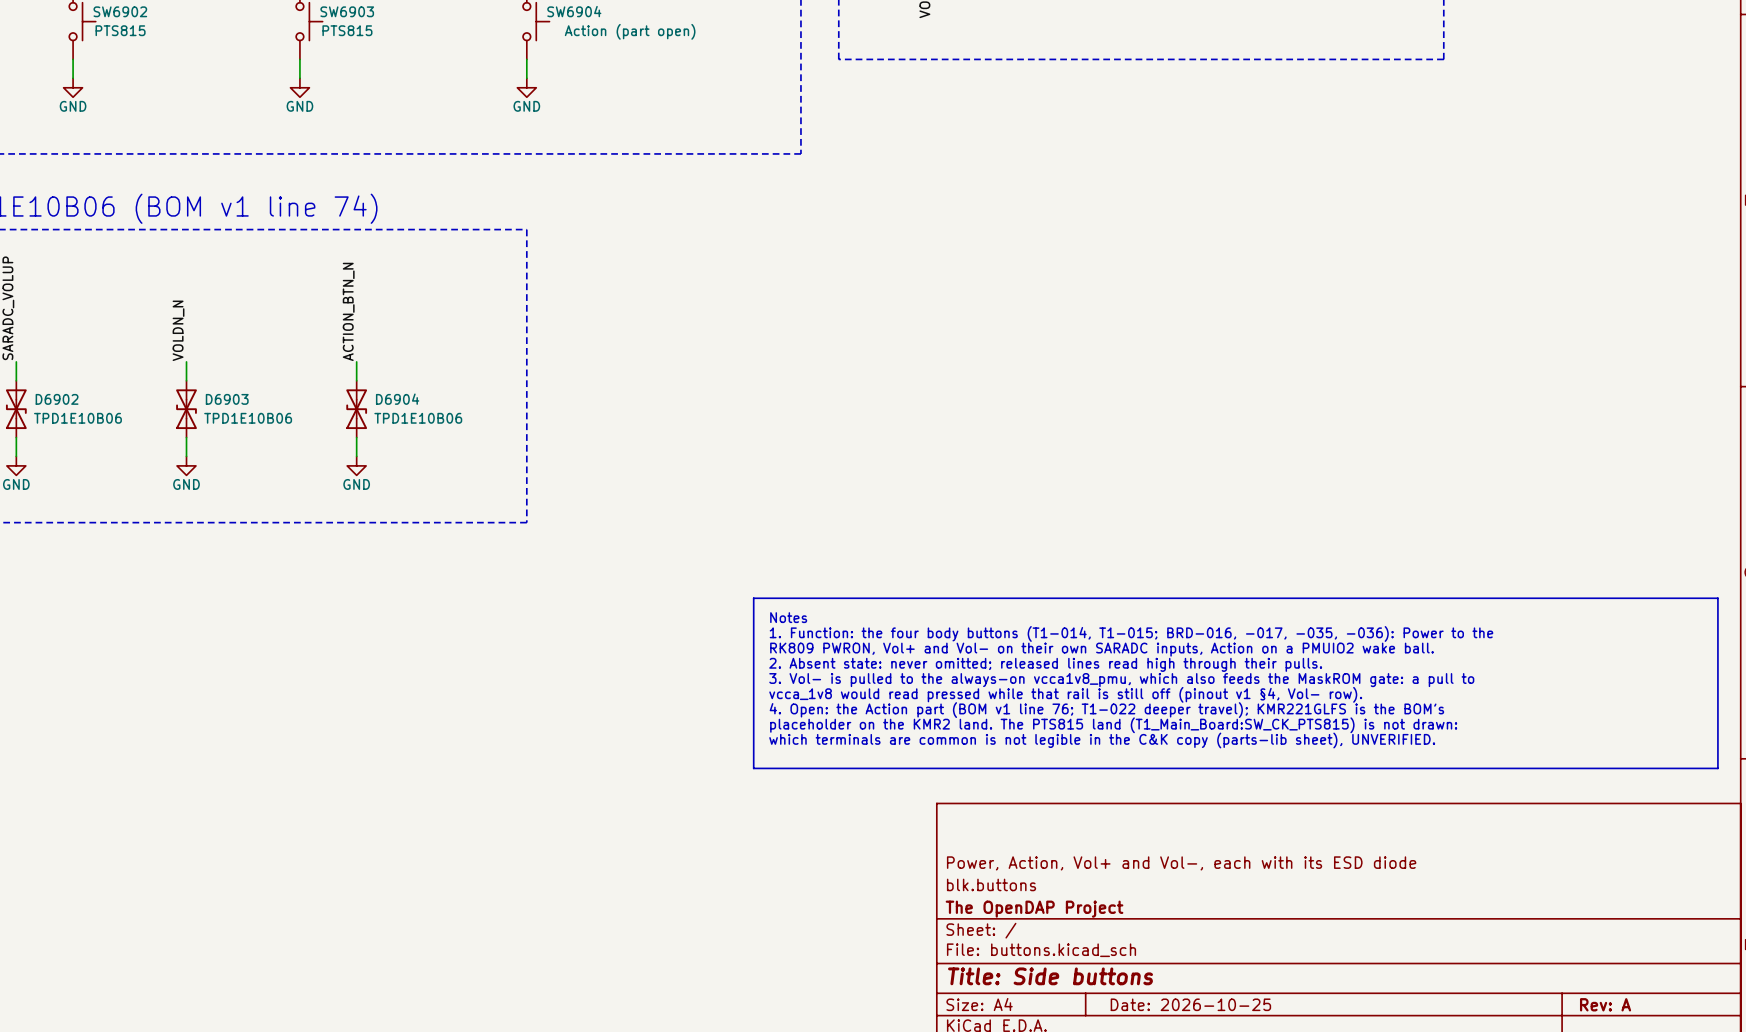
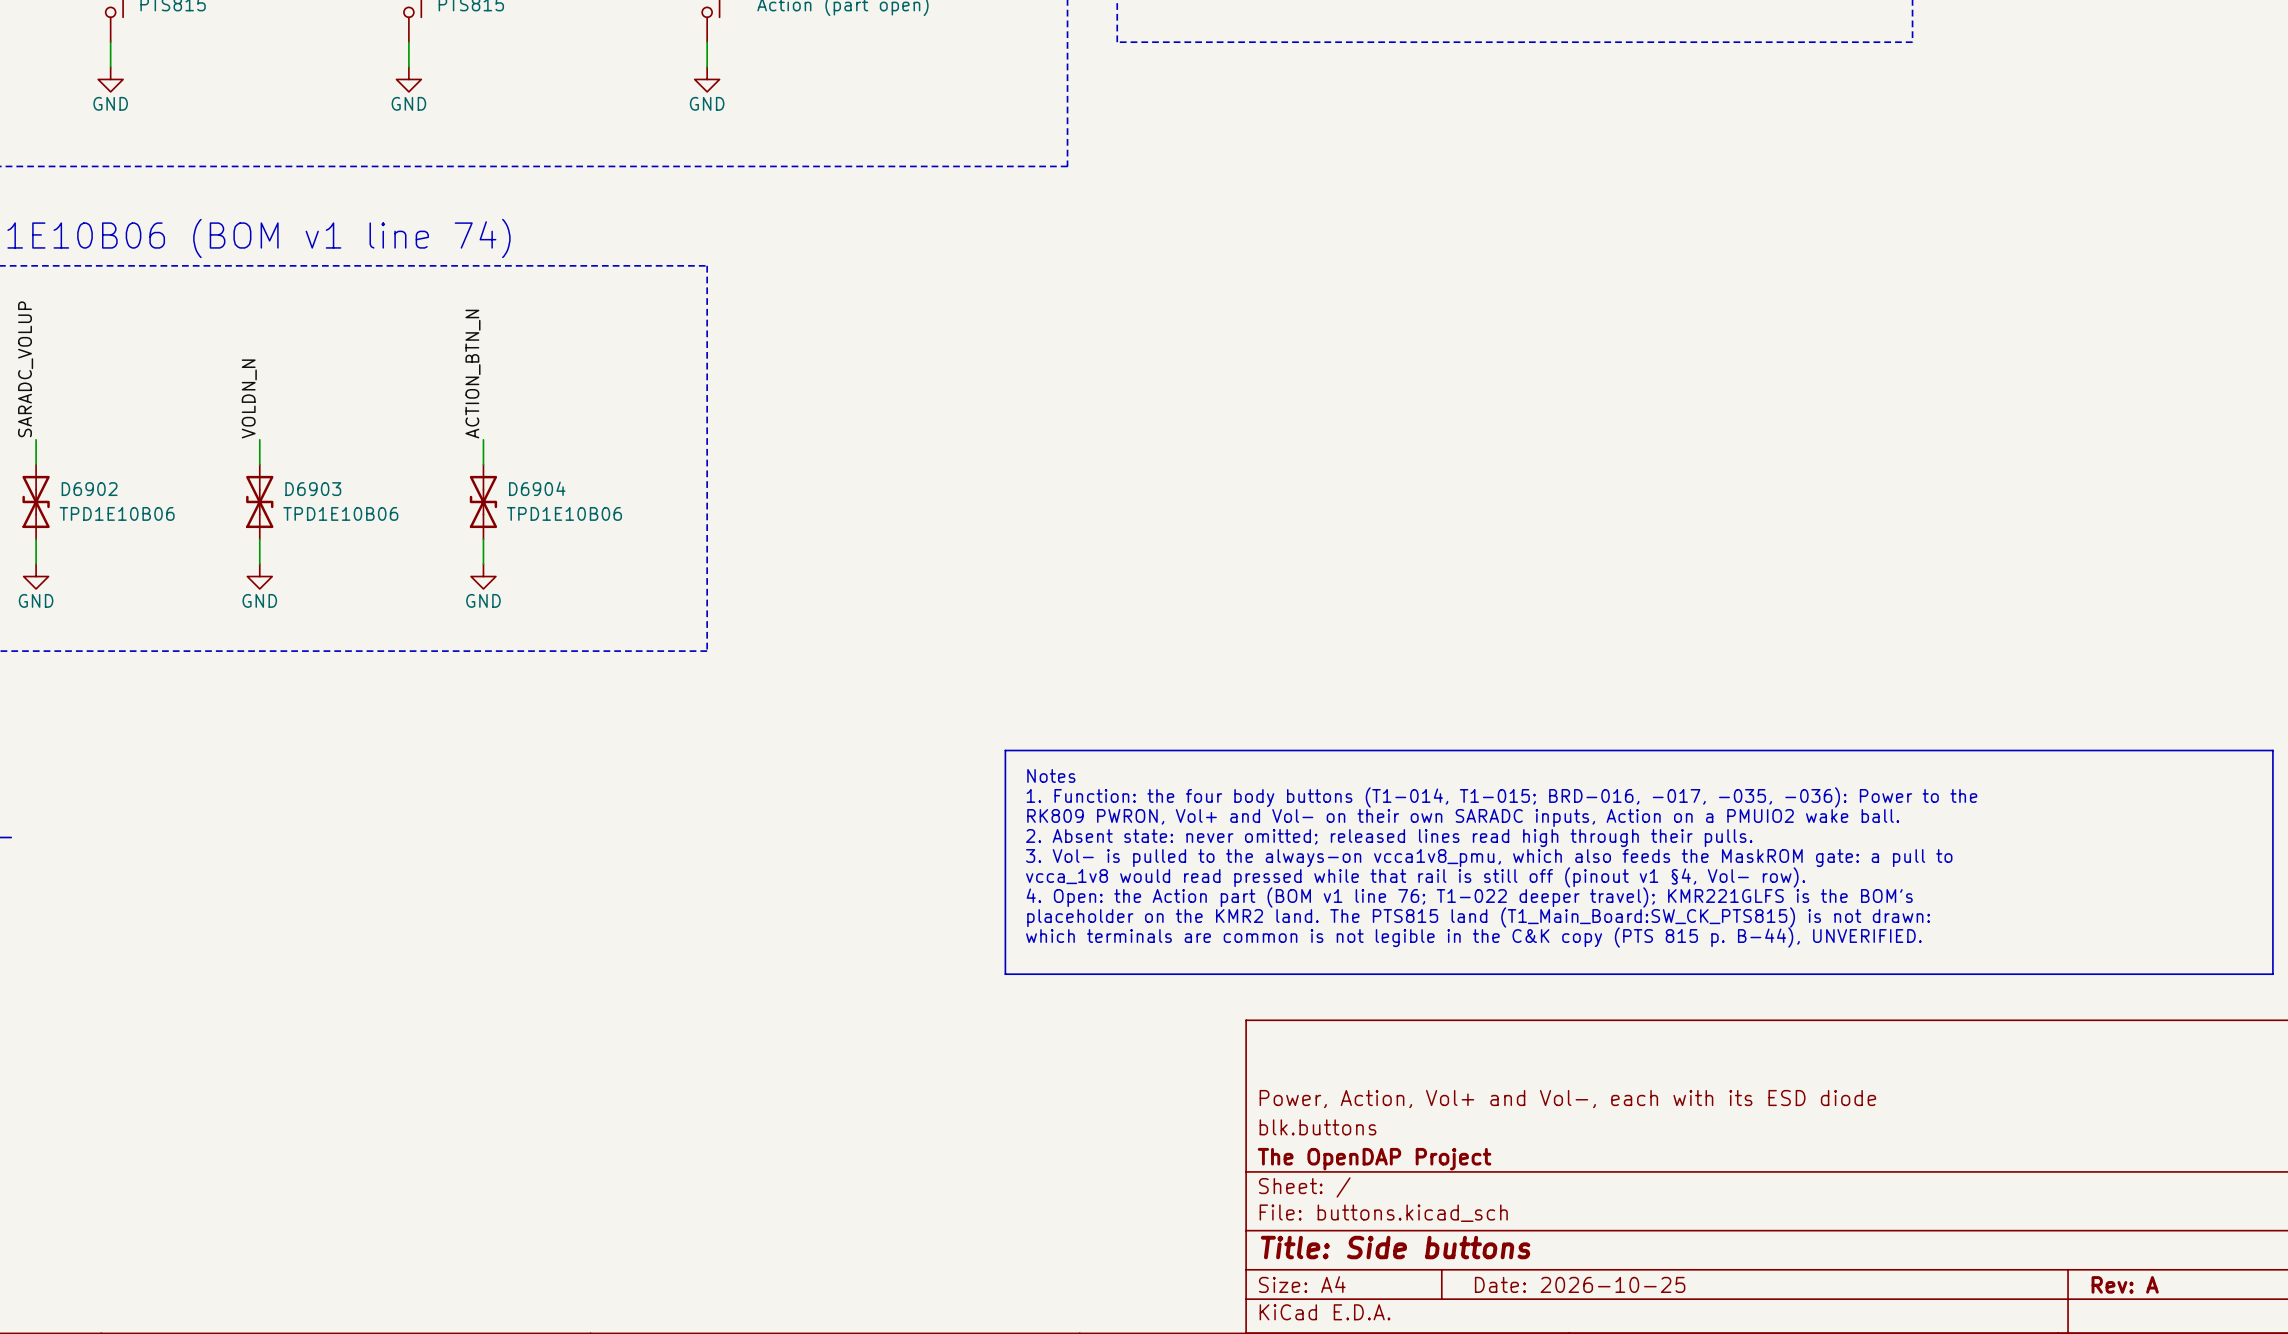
text: which terminals are common is not legible in the C&K copy (parts-lib sheet), UNVERIFIED. (1102, 740) -> which terminals are common is not legible in the C&K copy (PTS 815 p. B-44), UNVERIFIED. (1473, 937)

